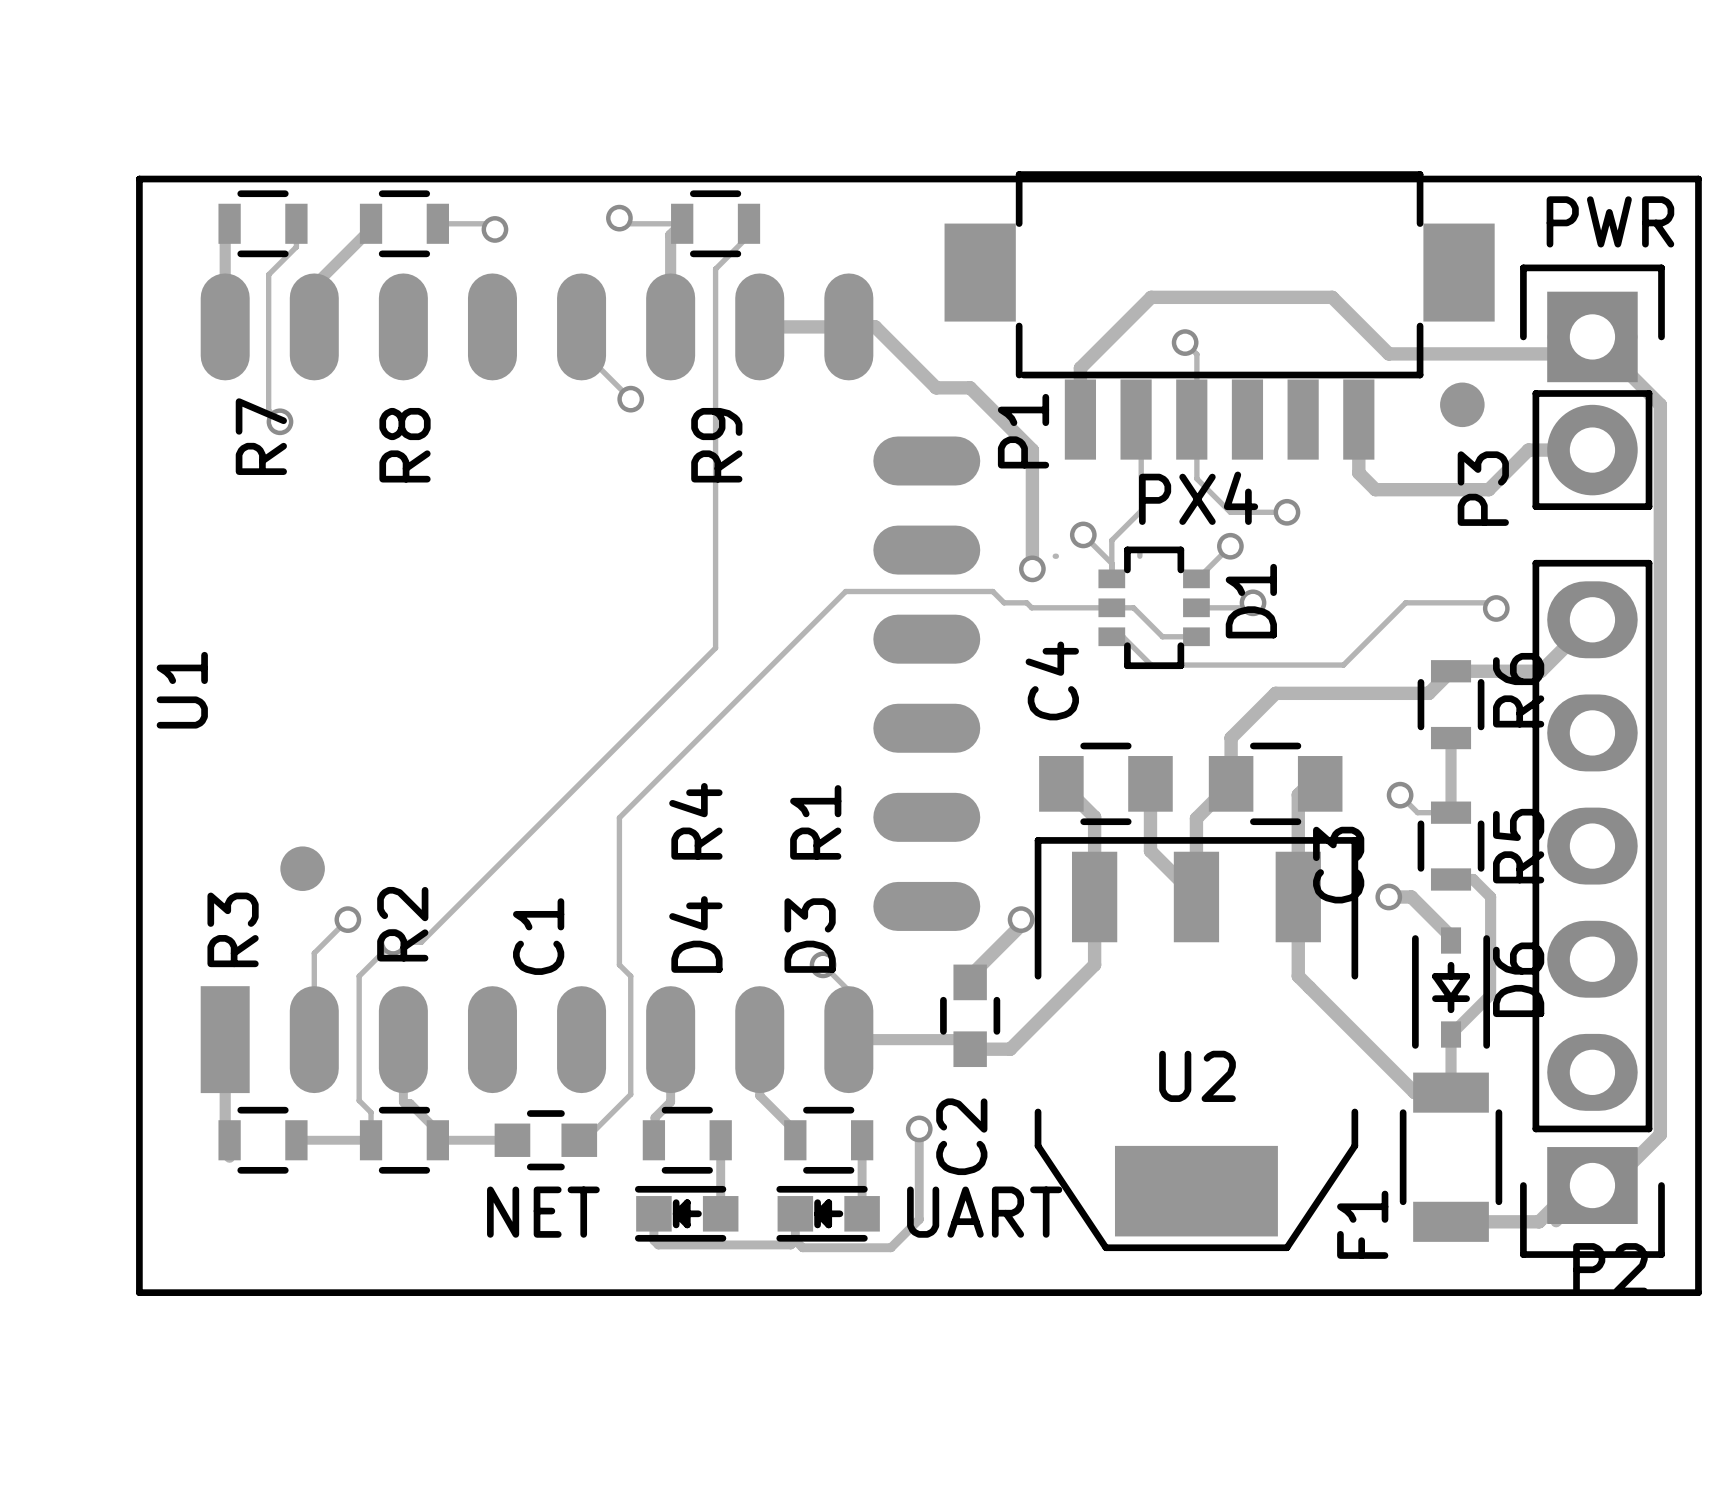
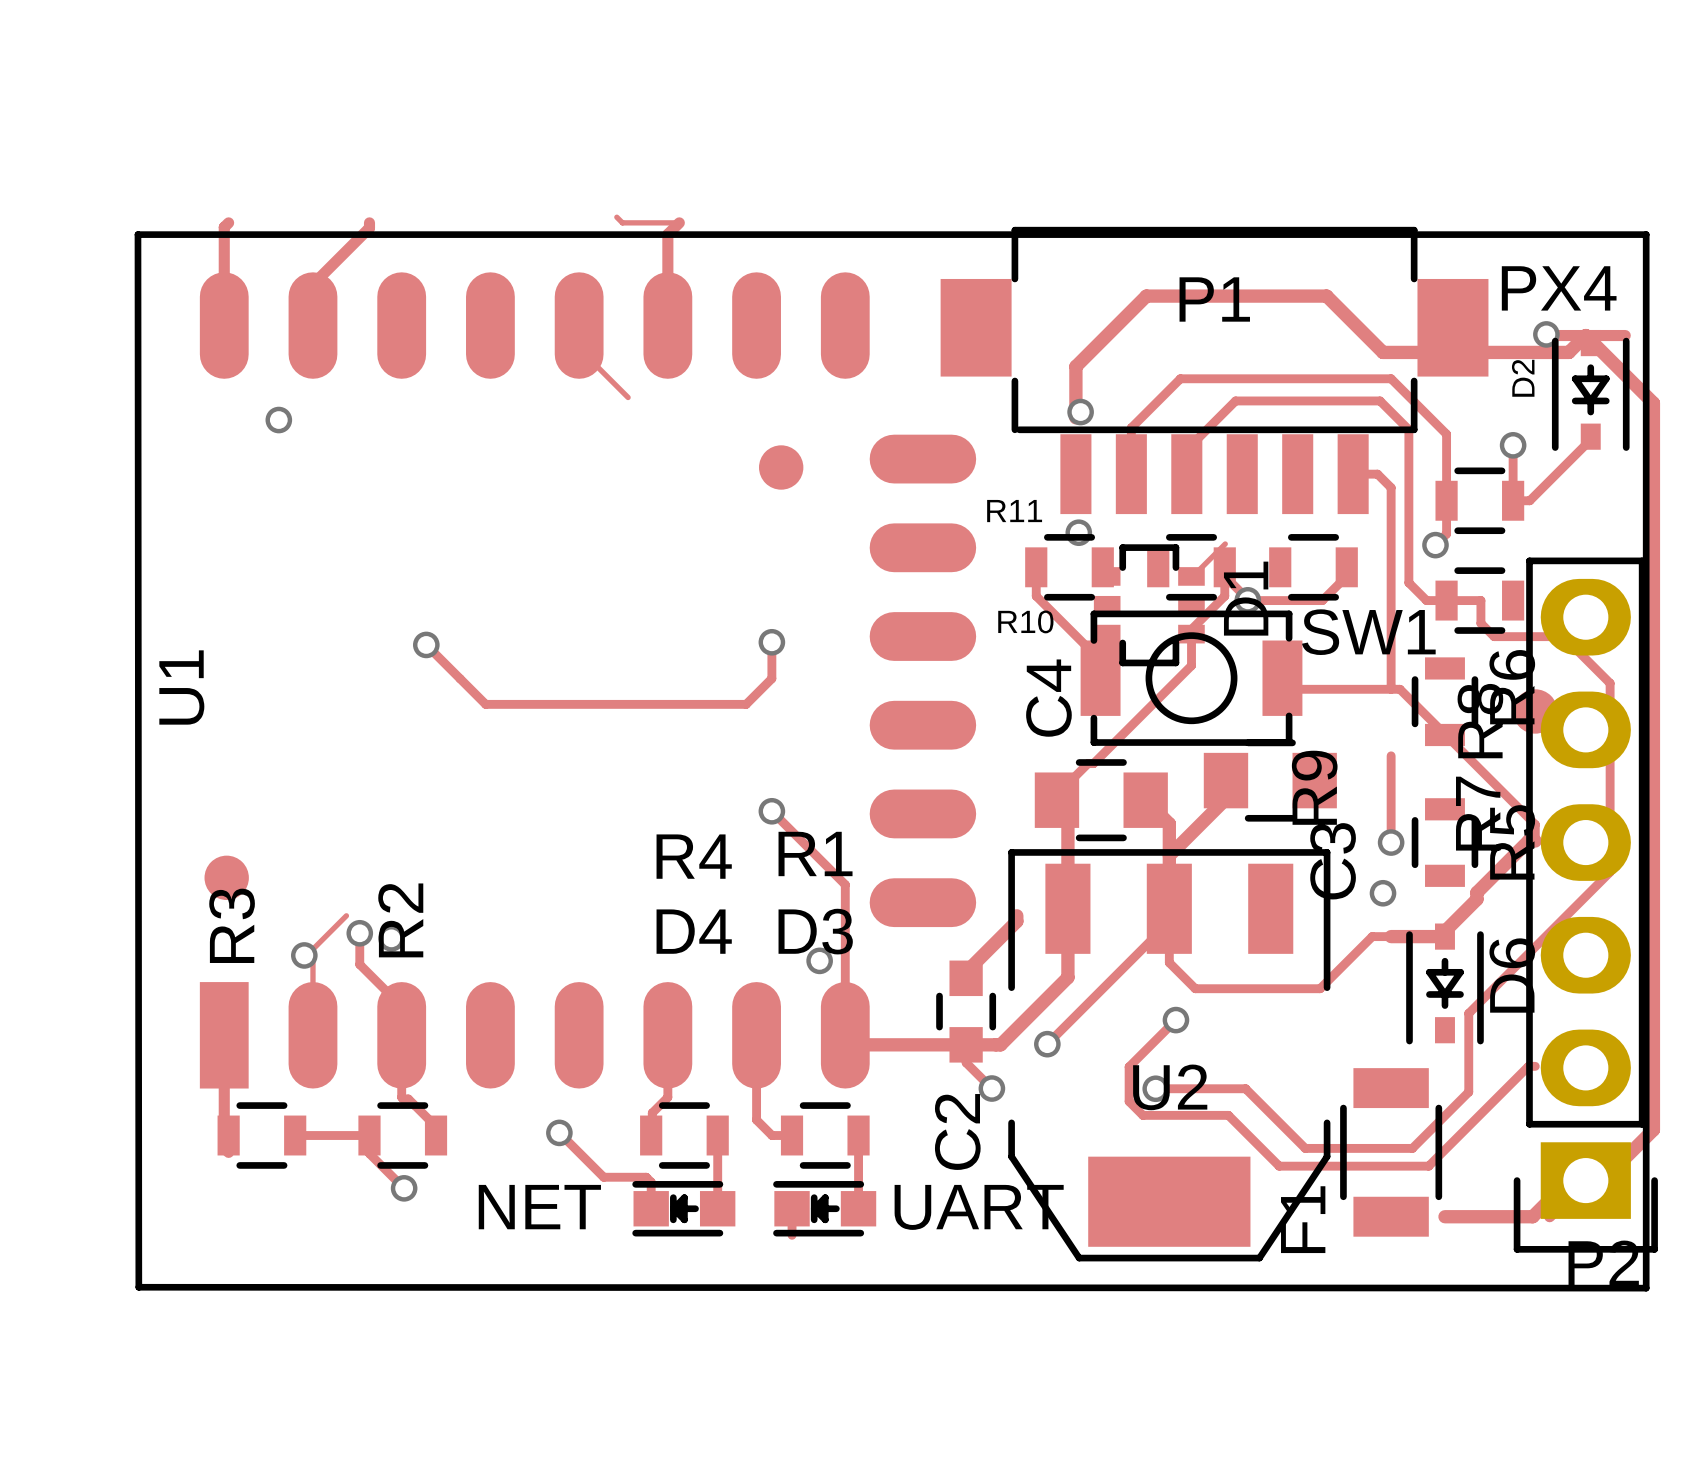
board edge: (139, 179) (139, 1292) (1698, 1292) (1698, 179) (139, 179) -> (137, 234) (138, 1287) (1646, 1288) (1646, 234) (137, 234)
via: (619, 218) -> none
R7 position: (263, 223) -> (1479, 600)
track: (296, 223) (296, 246) (268, 274) (268, 410) (279, 421) -> none
R8 position: (404, 223) -> (1479, 500)
track: (437, 223) (489, 223) (494, 229) -> none
R9 position: (715, 223) -> (1313, 567)
track: (748, 223) (748, 235) (715, 269) (715, 648) (421, 942) (393, 942) (359, 976) (359, 1100) (371, 1112) (371, 1140) -> none
via: (494, 229) -> none
P1 position: (1219, 315) -> (1214, 370)
track: (759, 326) (875, 326) (936, 387) (970, 387) (1032, 450) (1032, 568) -> none
via: none -> (1546, 334)
track: (1185, 342) (1196, 354) (1196, 478) (1230, 512) (1286, 512) -> none
via: (1185, 342) -> none
P3: PWR (1592, 387) -> none
D2: none -> (1590, 390)
via: (630, 399) -> none
part position: (1462, 404) -> (1535, 711)
via: none -> (1080, 412)
track: (1358, 419) (1358, 473) (1375, 489) (1488, 489) (1528, 450) (1592, 450) (1575, 433) -> none
P1 name rotation: 0° (1023, 431) -> 90° clockwise (1214, 299)
P1 name position: P1 (1023, 431) -> P1 (1214, 299)
track: (1141, 433) (1141, 510) (1111, 540) (1111, 578) -> none
track: none -> (1590, 436) (1590, 439) (1529, 500) (1513, 500) (1513, 445)
via: none -> (1513, 445)
part: none -> (781, 467)
track: none -> (1131, 474) (1131, 427) (1180, 378) (1391, 378) (1446, 434) (1446, 534) (1435, 545)
track: none -> (1186, 474) (1186, 449) (1235, 400) (1380, 400) (1408, 429) (1408, 582) (1426, 600) (1480, 600) (1480, 623) (1494, 636) (1563, 636) (1610, 683) (1610, 872) (1468, 1013) (1468, 1092) (1412, 1148) (1305, 1148) (1245, 1088) (1155, 1088)
track: none -> (1353, 474) (1377, 474) (1391, 487) (1391, 689)
P1 value position: PX4 (1198, 498) -> PX4 (1559, 288)
via: (1286, 512) -> none
track: (1083, 534) (1111, 563) -> none
via: (1230, 546) -> none
via: none -> (1435, 545)
track: (1139, 551) (1139, 556) -> none
track: (1055, 556) (1056, 556) -> none
via: (1032, 568) -> none
track: none -> (1036, 567) (1036, 596) (1100, 660) (1100, 678)
R11: none -> (1069, 567)
R10: none -> (1191, 567)
track: none -> (1346, 567) (1346, 576) (1322, 600) (1249, 600) (1224, 576)
track: (1253, 602) (1248, 607) (1196, 607) -> none
track: (1496, 608) (1490, 602) (1405, 602) (1343, 665) (1151, 665) (1122, 636) (1111, 636) -> none
via: (1496, 608) -> none
track: (1592, 619) (1541, 671) (1451, 671) (1428, 693) (1275, 693) (1231, 737) (1231, 783) (1196, 818) (1196, 896) (1150, 851) (1150, 783) -> none
track: (1196, 636) (1162, 636) (1133, 607) (1031, 607) (1026, 602) (1004, 602) (992, 591) (845, 591) (619, 817) (619, 964) (630, 976) (630, 1094) (579, 1145) -> none
track: none -> (771, 642) (771, 678) (746, 704) (485, 704) (426, 644)
via: none -> (771, 642)
via: none -> (426, 644)
SW1: none -> (1191, 678)
track: none -> (1282, 678) (1293, 689) (1400, 689) (1535, 824) (1535, 841) (1528, 841) (1476, 892) (1476, 899) (1439, 936) (1372, 936) (1320, 988) (1195, 988) (1169, 962) (1169, 823) (1145, 800)
track: (1451, 738) (1451, 812) (1417, 812) (1400, 795) -> none
track: none -> (1391, 755) (1391, 842)
track: (1061, 783) (1094, 817) (1094, 964) (1010, 1049) (1004, 1049) -> (1224, 567) (1224, 596) (1191, 629) (1191, 665) (1093, 763) (1088, 763) (1056, 794) (1056, 800) (1067, 811) (1067, 977) (1000, 1044)
C4 position: (1105, 783) -> (1101, 800)
track: (1320, 783) (1320, 772) (1298, 794) (1298, 976) (1414, 1092) (1451, 1092) (1451, 1034) (1490, 994) (1490, 896) (1473, 879) (1451, 879) -> none
via position: (1400, 795) -> (1391, 842)
track: none -> (1224, 800) (1169, 855)
via: none -> (771, 811)
R4 name rotation: 0° (695, 821) -> 90° clockwise (694, 856)
R1 name rotation: 0° (815, 822) -> 90° clockwise (815, 853)
part position: (302, 868) -> (226, 877)
track: (1388, 896) (1411, 896) (1451, 936) (1451, 940) -> none
via position: (347, 919) -> (359, 933)
via: (1021, 919) -> none
track: none -> (1169, 922) (1047, 1044)
D4 name rotation: 0° (695, 934) -> 90° clockwise (694, 931)
D3 name rotation: 0° (810, 935) -> 90° clockwise (815, 931)
track: none -> (359, 933) (359, 964) (401, 1006) (401, 1035)
via: none -> (304, 955)
track: (823, 964) (848, 990) -> (771, 811) (845, 884) (845, 986)
track: none -> (1175, 1020) (1129, 1066) (1129, 1101) (1142, 1115) (1228, 1115) (1279, 1166) (1428, 1166) (1528, 1066) (1535, 1066)
via: none -> (1175, 1020)
track: (848, 1039) (960, 1039) (970, 1049) -> (845, 1035) (854, 1044) (966, 1044) (966, 1062) (991, 1088)
U2 position: (1196, 1044) -> (1169, 1055)
via: none -> (1047, 1044)
via: none -> (991, 1088)
via: none -> (1155, 1088)
track: (759, 1095) (795, 1131) (795, 1140) -> (756, 1091) (756, 1120) (772, 1135) (792, 1135)
track: (919, 1128) (919, 1219) (890, 1247) (802, 1247) (795, 1240) (790, 1244) (658, 1244) (653, 1240) (653, 1213) -> (559, 1132) (603, 1177) (646, 1177) (651, 1182) (651, 1208)
via: (919, 1128) -> none
via: none -> (559, 1132)
track: (437, 1140) (512, 1140) -> none
C1: (545, 1140) -> none
track: none -> (369, 1152) (404, 1188)
F1 position: (1451, 1157) -> (1391, 1152)
via: none -> (404, 1188)

